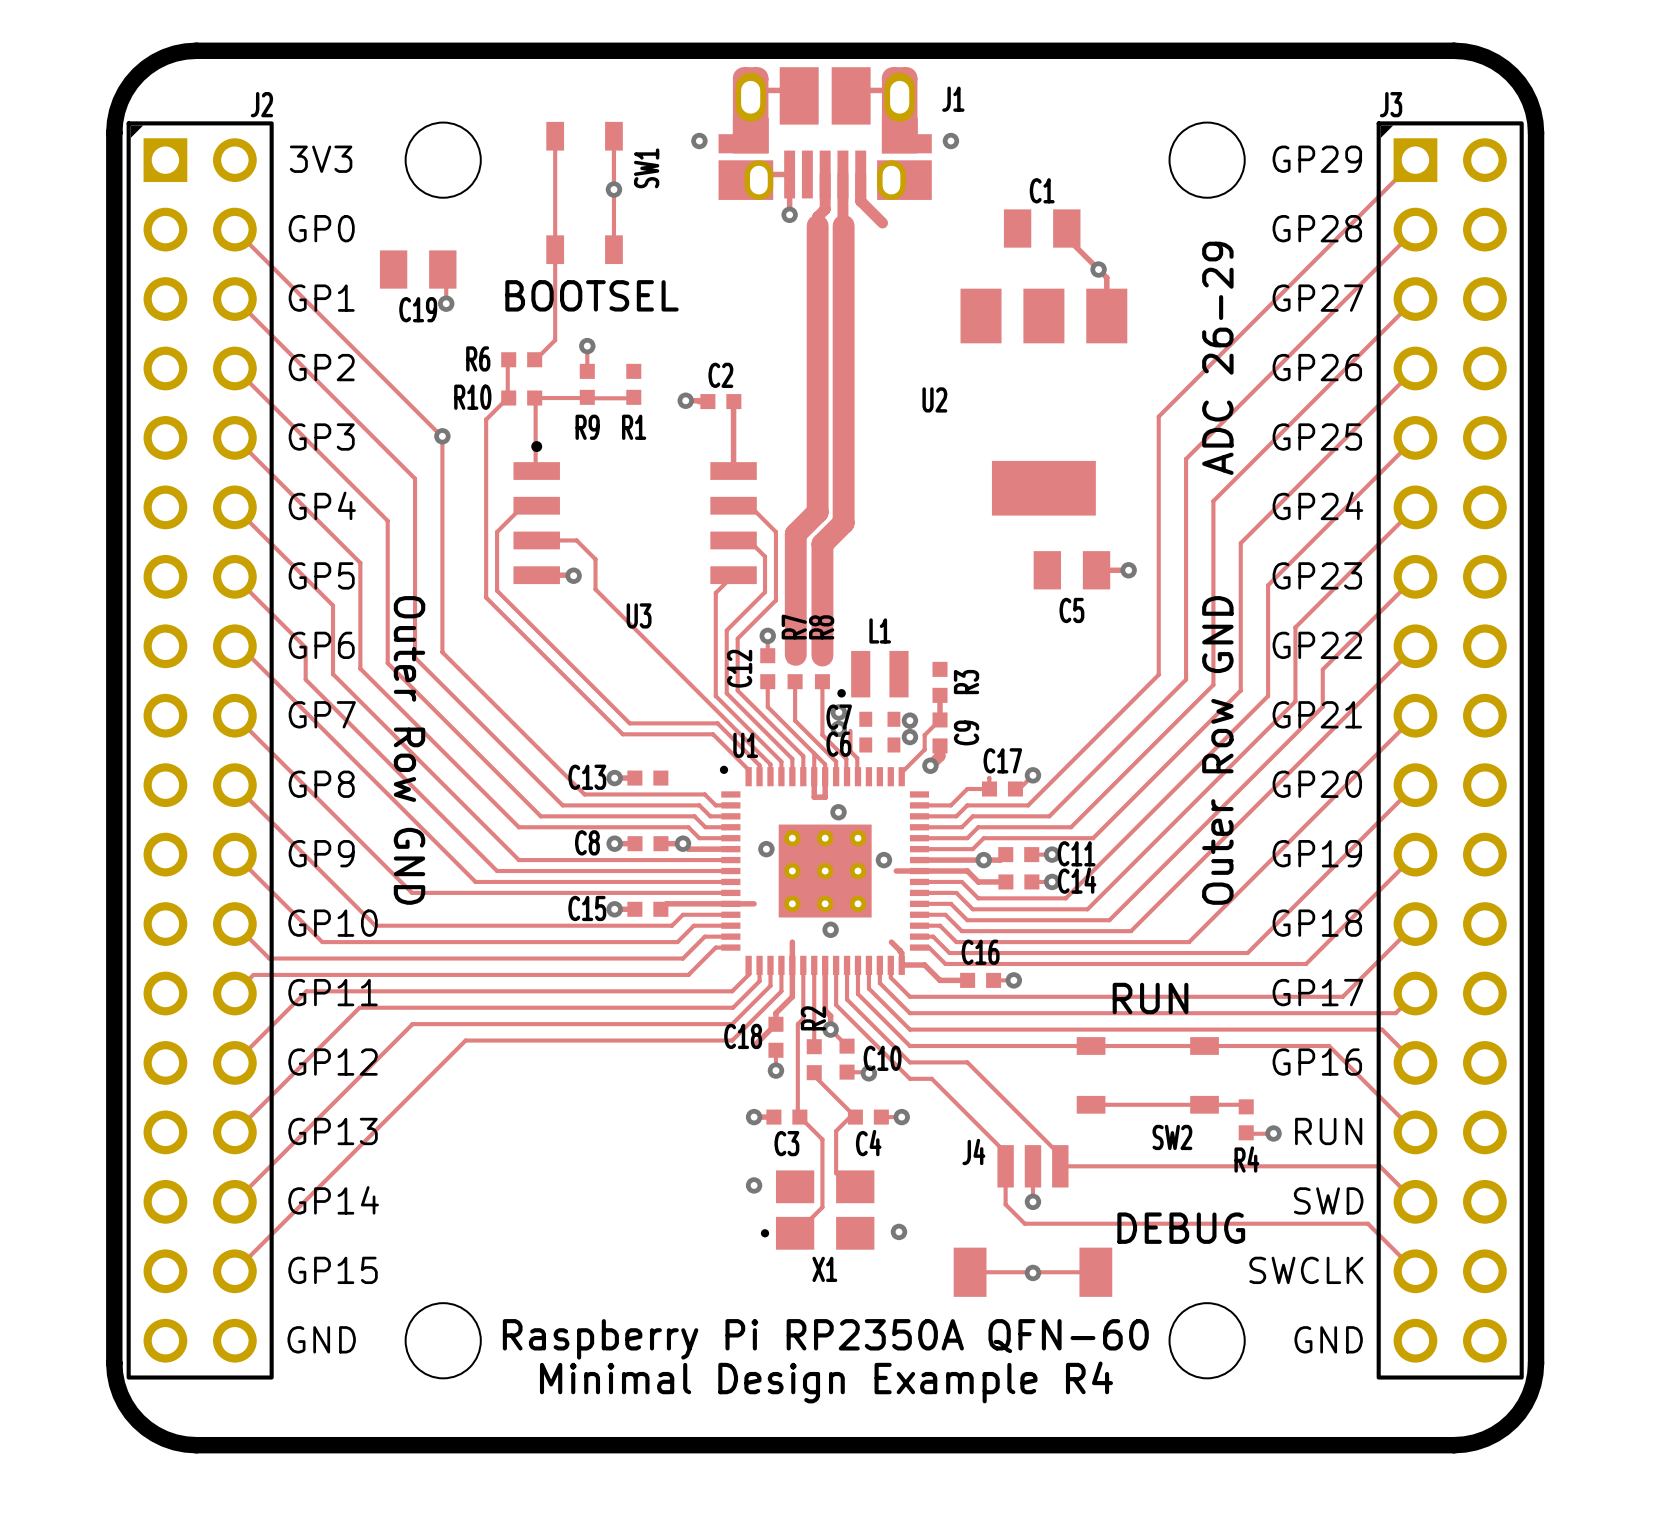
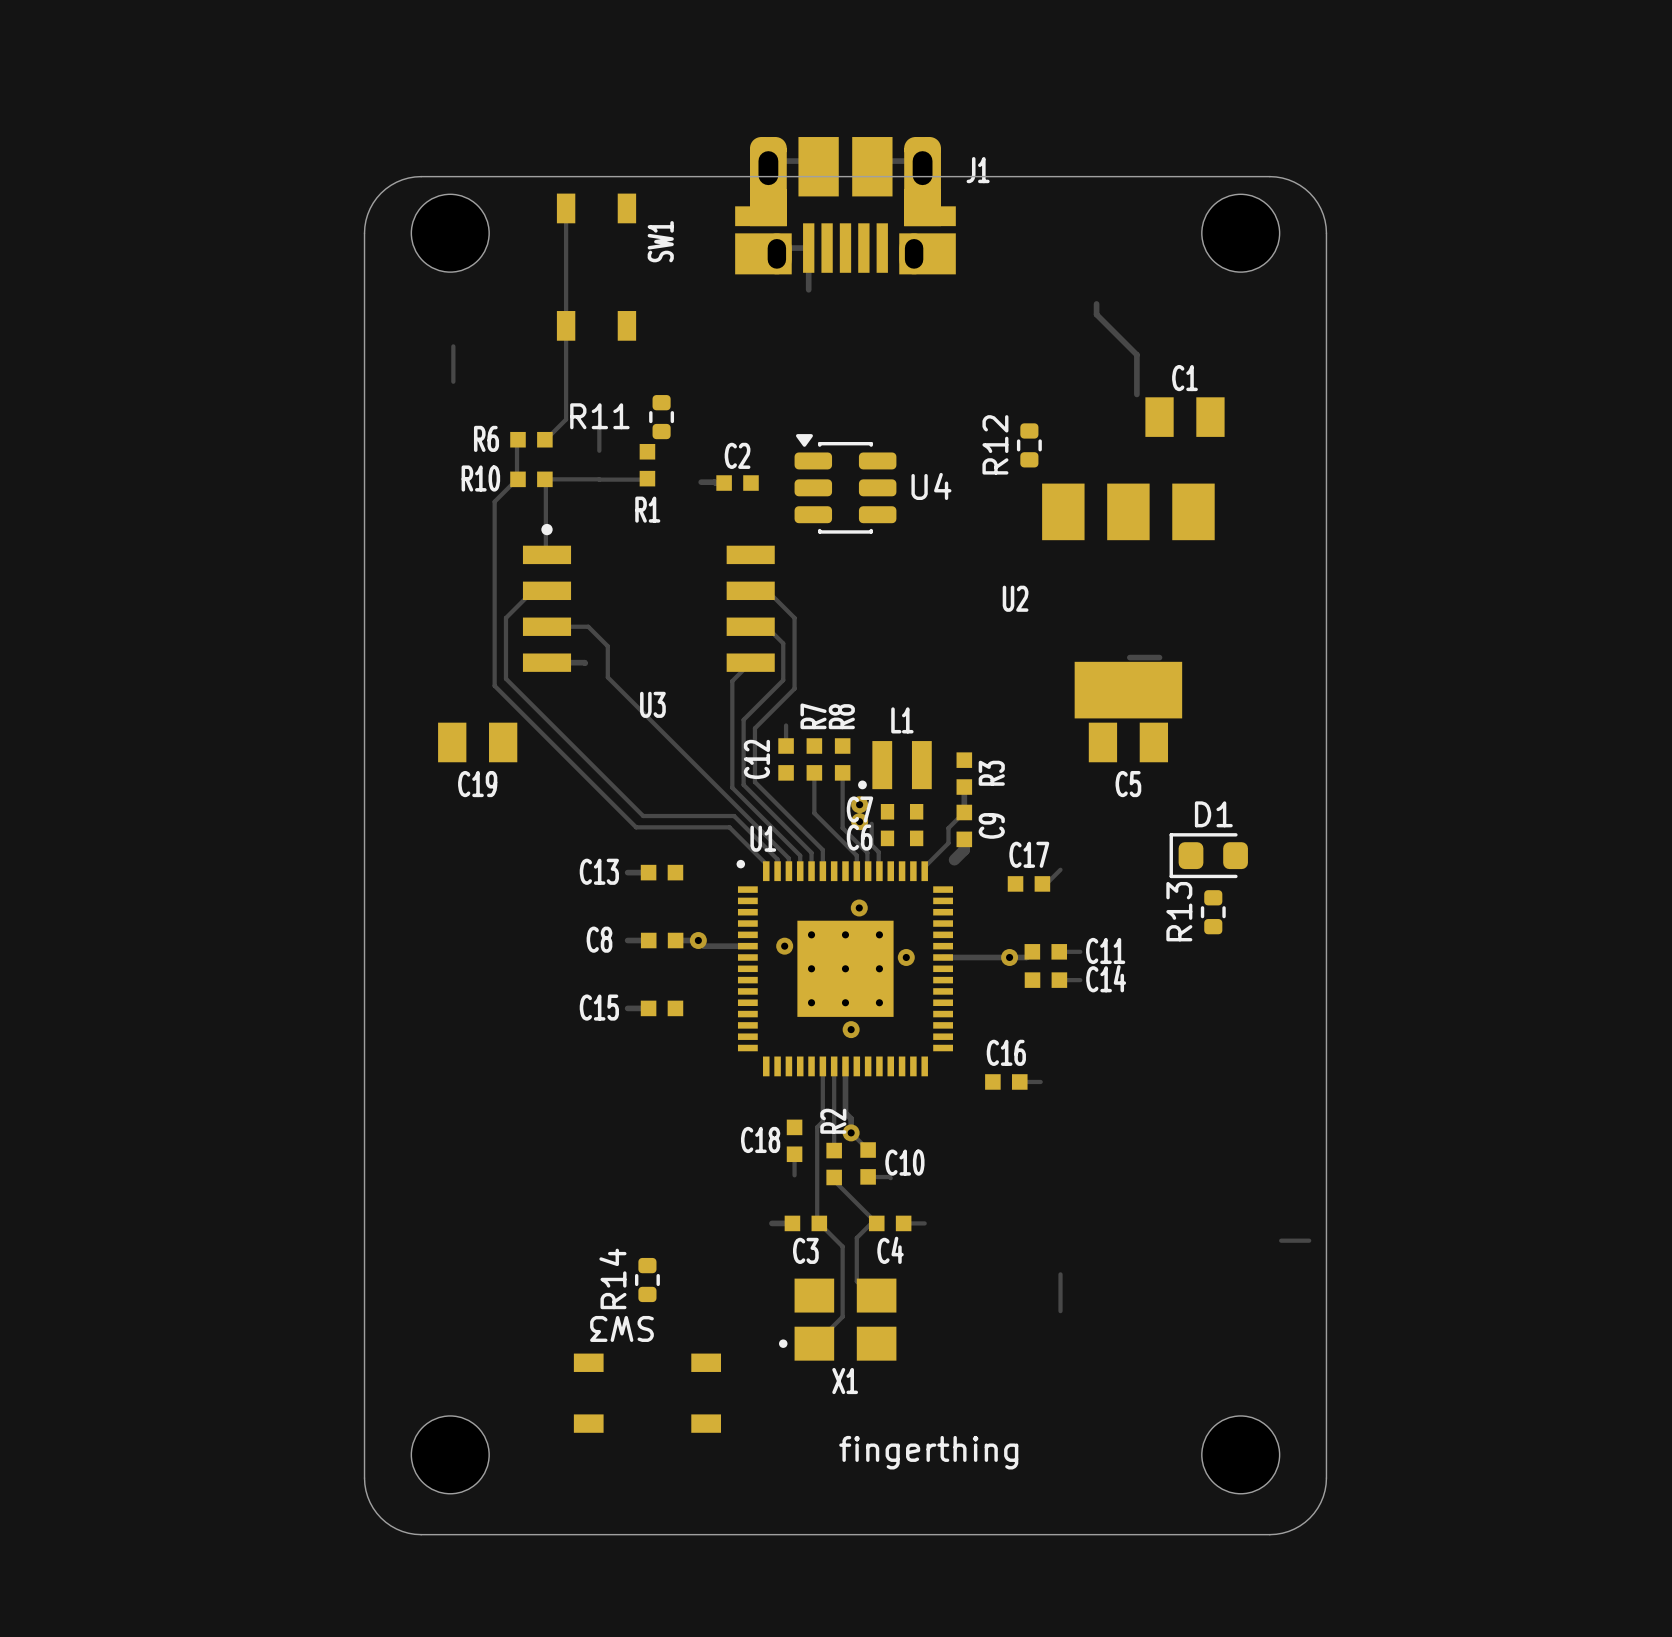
board edge: (196, 50) (1454, 50) (1485, 57) (1512, 74) (1529, 101) (1536, 132) (1536, 1363) (1529, 1394) (1512, 1421) (1485, 1438) (1454, 1445) (196, 1445) (164, 1438) (138, 1421) (120, 1394) (114, 1363) (114, 132) (120, 101) (138, 74) (164, 57) (196, 50) -> (421, 176) (402, 179) (381, 193) (367, 214) (364, 233) (364, 1478) (367, 1496) (373, 1508) (385, 1522) (396, 1529) (421, 1534) (1269, 1534) (1288, 1531) (1299, 1525) (1314, 1513) (1320, 1502) (1326, 1478) (1326, 233) (1323, 214) (1317, 203) (1305, 188) (1294, 182) (1269, 176) (421, 176)
track: (613, 136) (613, 249) -> none
via: (699, 141) -> none
via: (950, 141) -> none
text: 3V3 (321, 159) -> none
text: GP29 (1317, 159) -> none
track: (1415, 160) (1158, 416) (1158, 674) (1028, 805) (967, 805) (956, 816) (919, 816) -> none
track: (825, 174) (825, 209) (817, 216) (817, 512) (795, 534) (795, 654) -> none
track: (842, 174) (843, 522) (822, 544) (822, 655) -> none
track: (860, 174) (860, 201) (882, 223) -> none
via: (613, 189) -> none
via: (789, 214) -> none
text: GP0 (321, 228) -> none
C1 position: (1042, 228) -> (1184, 417)
text: GP28 (1317, 228) -> none
track: (234, 229) (442, 437) (442, 652) (584, 794) (704, 794) (715, 805) (731, 805) -> none
track: (1415, 229) (1186, 458) (1186, 679) (1049, 816) (972, 816) (961, 827) (919, 827) -> none
C19 position: (418, 269) -> (477, 742)
via: (1098, 269) -> none
text: BOOTSEL (591, 295) -> none
text: GP1 (321, 298) -> none
text: GP27 (1317, 298) -> none
track: (235, 299) (415, 478) (415, 657) (562, 805) (699, 805) (710, 816) (731, 816) -> none
track: (1415, 299) (1213, 501) (1213, 684) (1071, 827) (978, 827) (967, 838) (919, 838) -> none
via: (446, 303) -> none
R11: none -> (661, 417)
via: (587, 346) -> none
text: ADC 26-29 (1217, 358) -> none
R12: none -> (1029, 445)
text: GP2 (321, 367) -> none
text: GP26 (1317, 367) -> none
track: (235, 368) (387, 520) (387, 663) (540, 816) (694, 816) (705, 827) (731, 827) -> none
track: (1415, 368) (1240, 543) (1240, 690) (1093, 838) (983, 838) (972, 849) (919, 849) -> none
R9: (587, 384) -> none
via: (685, 400) -> none
track: (734, 401) (733, 471) -> none
U4: none -> (845, 483)
U2 position: (1043, 402) -> (1128, 601)
via: (442, 436) -> none
track: (235, 437) (360, 562) (360, 668) (518, 827) (688, 827) (699, 838) (731, 838) -> none
text: GP3 (321, 437) -> none
text: GP25 (1317, 437) -> none
track: (1415, 437) (1268, 585) (1268, 696) (1065, 898) (978, 898) (961, 881) (919, 881) -> none
text: GP4 (322, 505) -> none
text: GP24 (1317, 505) -> none
track: (234, 507) (333, 605) (333, 674) (518, 860) (731, 860) -> none
track: (1415, 507) (1295, 627) (1295, 701) (1087, 909) (972, 909) (956, 892) (919, 892) -> none
C5 position: (1071, 570) -> (1128, 742)
via: (1128, 570) -> none
text: GP5 (321, 575) -> none
via: (573, 575) -> none
text: GP23 (1317, 575) -> none
track: (234, 576) (305, 647) (305, 679) (497, 871) (731, 871) -> none
track: (1415, 576) (1322, 669) (1322, 706) (1109, 920) (967, 920) (950, 903) (919, 903) -> none
via: (767, 635) -> none
text: GP6 (321, 645) -> none
text: GP22 (1317, 645) -> none
track: (234, 646) (239, 646) (475, 881) (731, 881) -> none
track: (1415, 646) (1130, 931) (961, 931) (945, 914) (919, 914) -> none
track: (767, 681) (767, 706) (825, 764) (825, 797) (814, 797) (814, 753) -> none
text: GP7 (322, 714) -> none
text: GP21 (1317, 714) -> none
track: (234, 715) (412, 892) (731, 892) -> none
track: (1415, 715) (1189, 942) (956, 942) (940, 925) (919, 925) -> none
via: (909, 720) -> none
via: (909, 737) -> none
J2: (200, 750) -> none
text: Outer Row GND (409, 750) -> none
text: Outer Row GND (1217, 750) -> none
J3: (1450, 750) -> none
D1: none -> (1208, 855)
via: (930, 765) -> none
via: (1032, 775) -> none
via: (614, 778) -> none
track: (989, 778) (989, 789) (967, 789) (950, 805) (919, 805) -> none
text: GP8 (321, 784) -> none
text: GP20 (1317, 784) -> none
track: (234, 785) (375, 925) (672, 925) (683, 914) (731, 914) -> none
track: (1415, 785) (1247, 953) (949, 953) (933, 936) (919, 936) -> none
R13: none -> (1213, 912)
via: (614, 843) -> none
text: GP9 (321, 853) -> none
text: GP19 (1317, 853) -> none
track: (234, 854) (322, 942) (677, 942) (693, 925) (731, 925) -> none
via: (1052, 854) -> none
track: (1415, 854) (1306, 963) (945, 963) (929, 947) (919, 947) -> none
track: (896, 871) (967, 871) (978, 881) (1005, 881) -> none
via: (1052, 881) -> none
track: (754, 903) (666, 903) (661, 909) -> none
via: (614, 909) -> none
text: GP10 (333, 923) -> none
text: GP18 (1317, 923) -> none
track: (234, 924) (269, 958) (683, 958) (704, 936) (731, 936) -> none
track: (1415, 924) (1342, 996) (909, 996) (890, 977) (890, 965) -> none
track: (792, 942) (792, 996) (775, 1013) (775, 1024) (756, 1043) -> none
track: (891, 942) (901, 953) (901, 965) (924, 965) (940, 980) (967, 980) -> none
track: (731, 947) (715, 947) (688, 974) (253, 974) (234, 993) -> none
track: (748, 965) (748, 974) (732, 991) (306, 991) (234, 1062) -> none
track: (759, 965) (759, 981) (733, 1007) (359, 1007) (234, 1132) -> none
track: (770, 965) (770, 985) (732, 1024) (412, 1024) (234, 1201) -> none
track: (781, 965) (781, 991) (732, 1040) (465, 1040) (234, 1271) -> none
track: (836, 965) (836, 1004) (909, 1078) (931, 1078) (1005, 1152) (1005, 1204) (1024, 1223) (1367, 1223) (1415, 1271) -> none
track: (847, 965) (847, 999) (909, 1062) (967, 1062) (1060, 1155) (1060, 1166) (1379, 1166) (1415, 1201) -> none
track: (857, 965) (857, 994) (909, 1046) (1329, 1046) (1415, 1132) -> none
track: (868, 965) (868, 988) (909, 1029) (1382, 1029) (1415, 1062) -> none
track: (879, 965) (879, 983) (909, 1013) (1395, 1013) (1415, 993) -> none
via: (1013, 980) -> none
text: GP11 (333, 992) -> none
text: GP17 (1317, 992) -> none
text: RUN (1150, 998) -> none
text: GP12 (333, 1062) -> none
text: GP16 (1317, 1062) -> none
via: (775, 1070) -> none
via: (868, 1073) -> none
SW2: (1147, 1075) -> none
track: (1091, 1104) (1246, 1105) -> none
via: (754, 1117) -> none
via: (901, 1117) -> none
R4: (1246, 1119) -> none
text: GP13 (333, 1131) -> none
text: RUN (1328, 1131) -> none
via: (1273, 1133) -> none
R14: none -> (647, 1280)
via: (754, 1185) -> none
text: GP14 (333, 1200) -> none
text: SWD (1328, 1200) -> none
via: (1032, 1201) -> none
J4: (1032, 1220) -> none
text: DEBUG (1181, 1228) -> none
via: (898, 1231) -> none
text: GP15 (333, 1270) -> none
text: SWCLK (1306, 1270) -> none
track: (970, 1272) (1095, 1272) -> none
via: (1032, 1272) -> none
SW3: none -> (647, 1393)
text: none -> fingerthing (928, 1452)
text: GND (321, 1339) -> none
text: Raspberry Pi RP2350A QFN-60 (825, 1339) -> none
text: GND (1328, 1339) -> none
text: Minimal Design Example R4 (826, 1382) -> none

